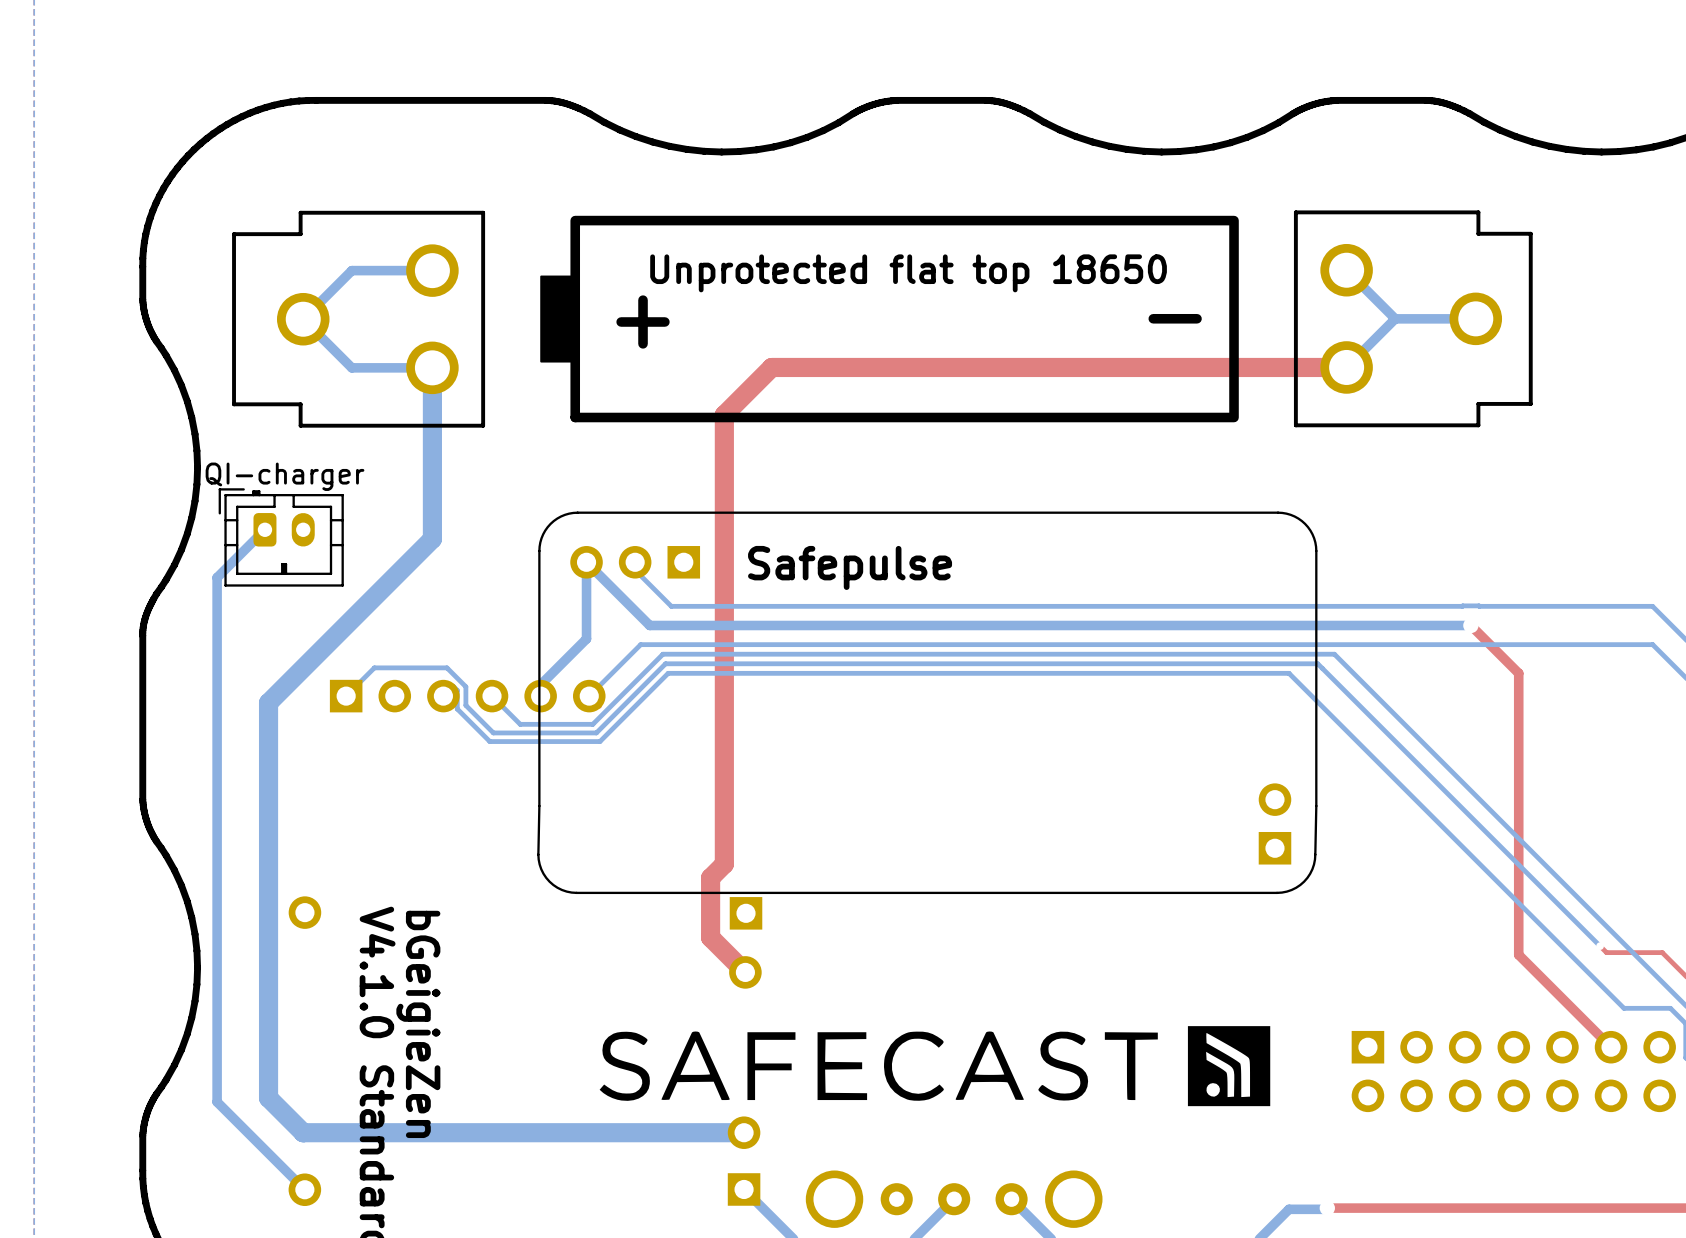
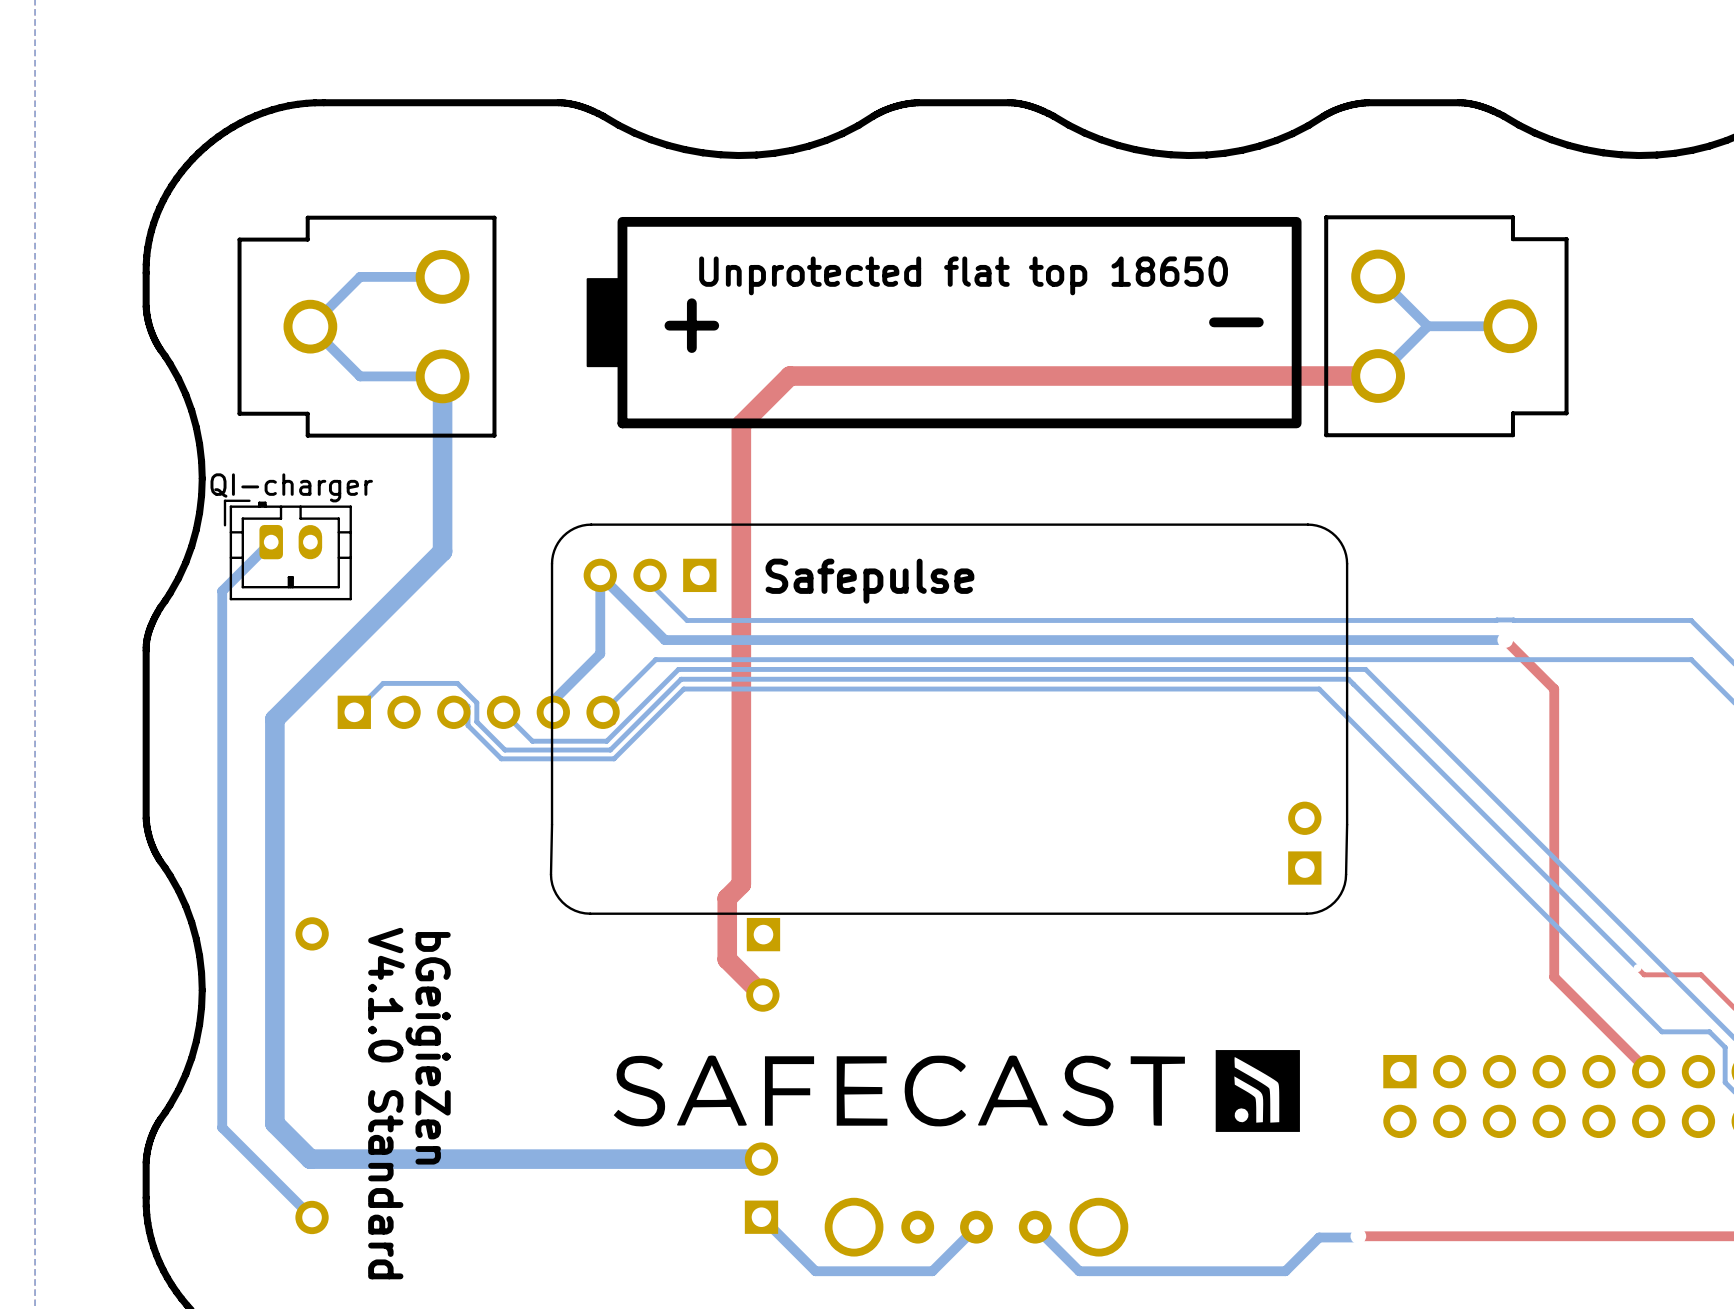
drawing position: (889, 319) -> (944, 322)

